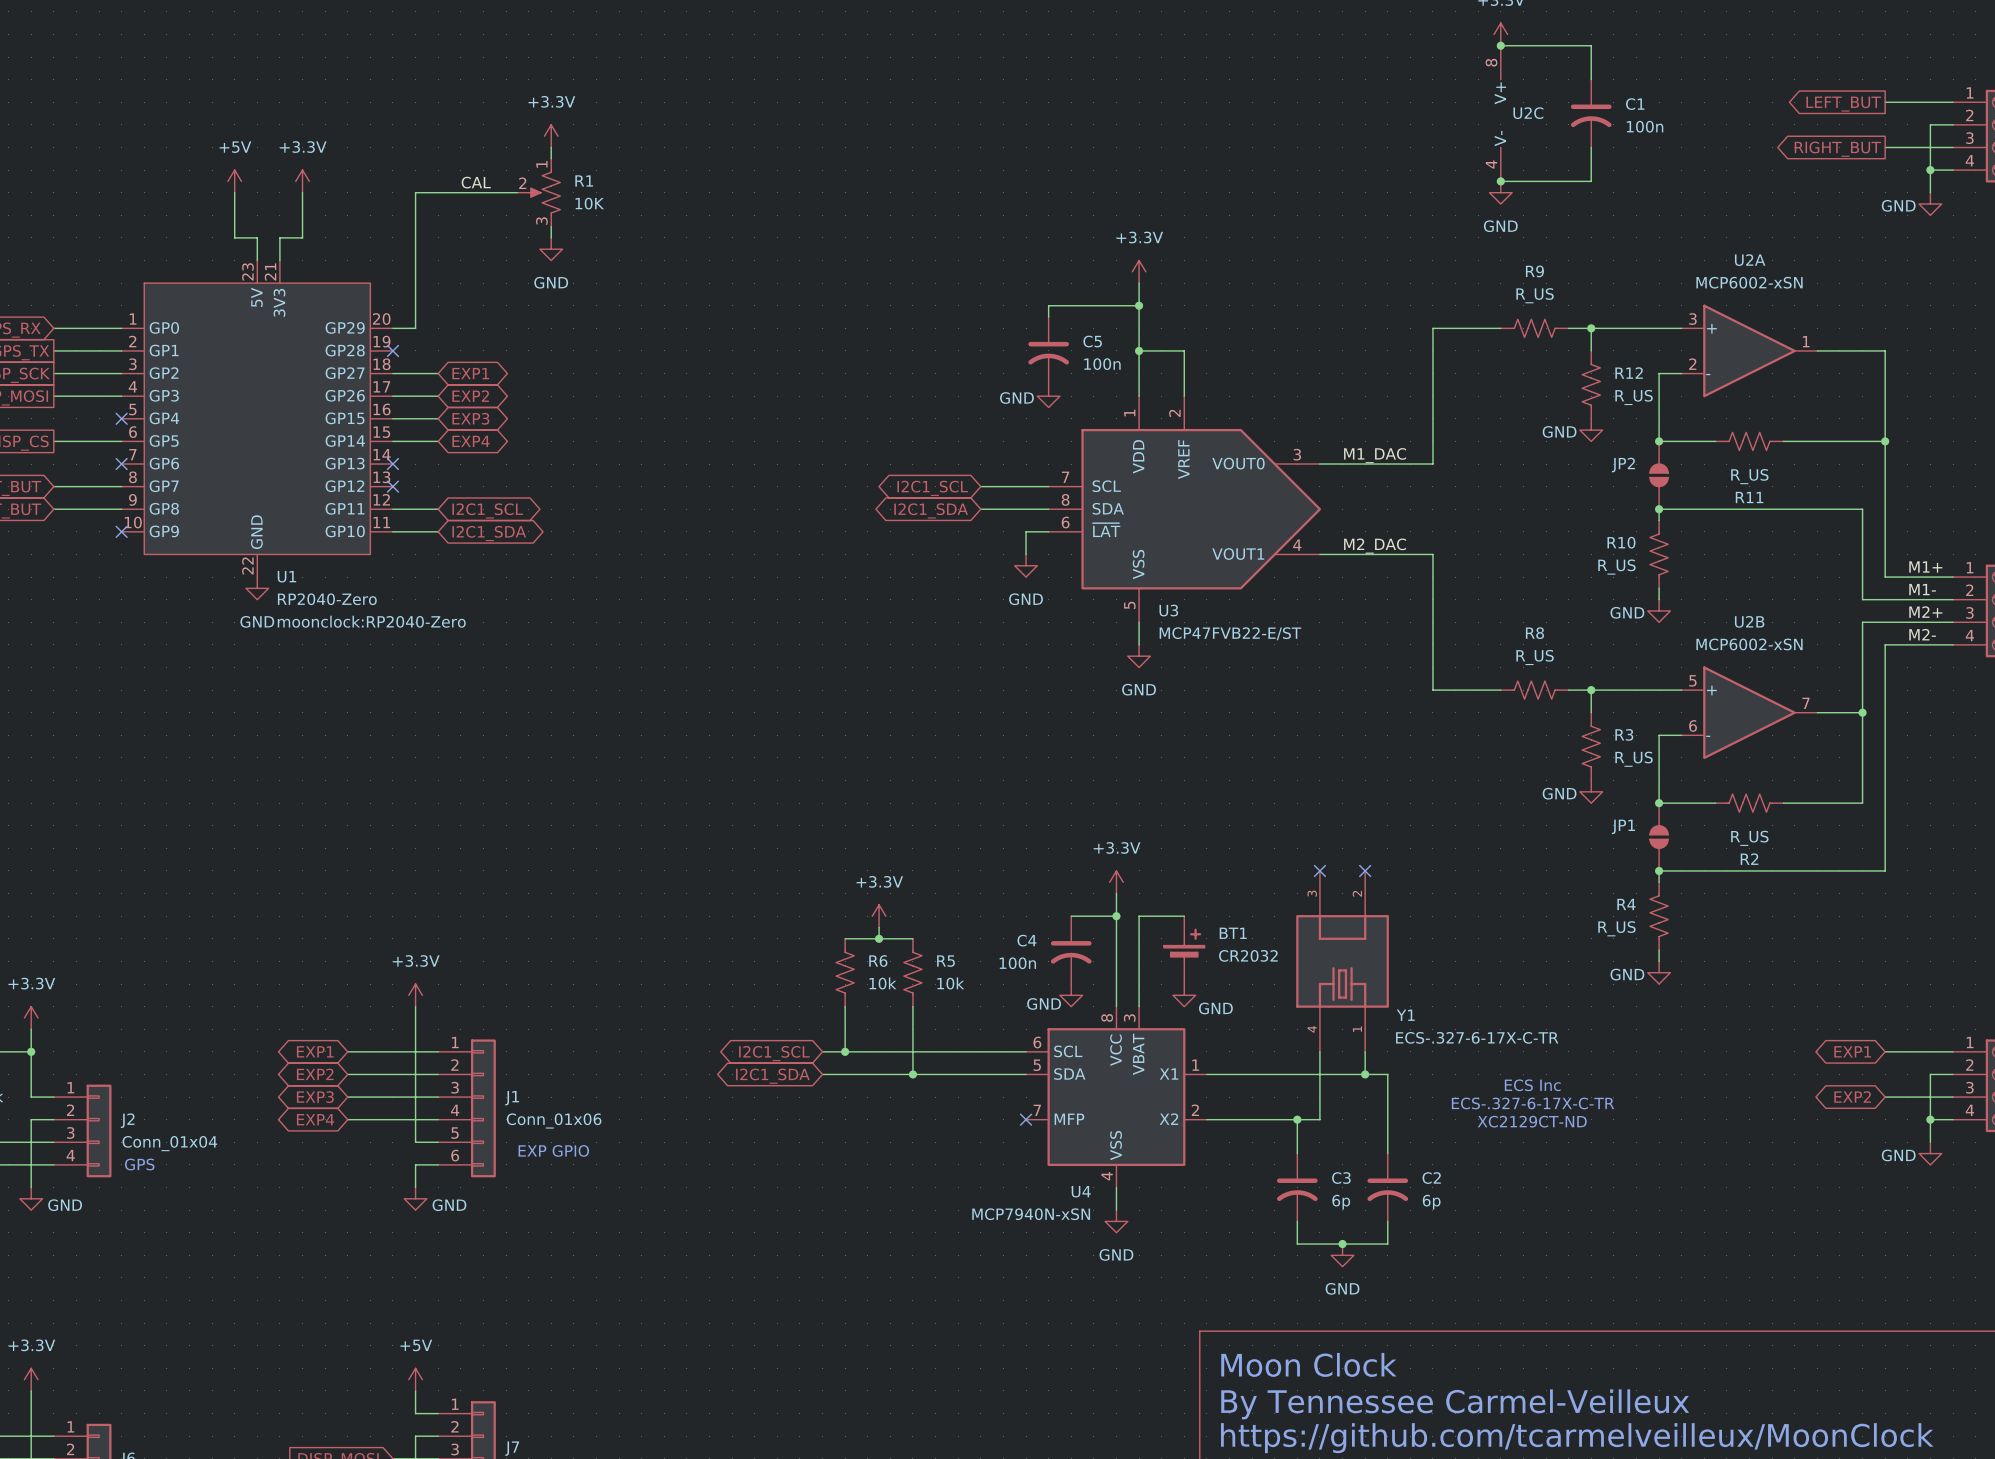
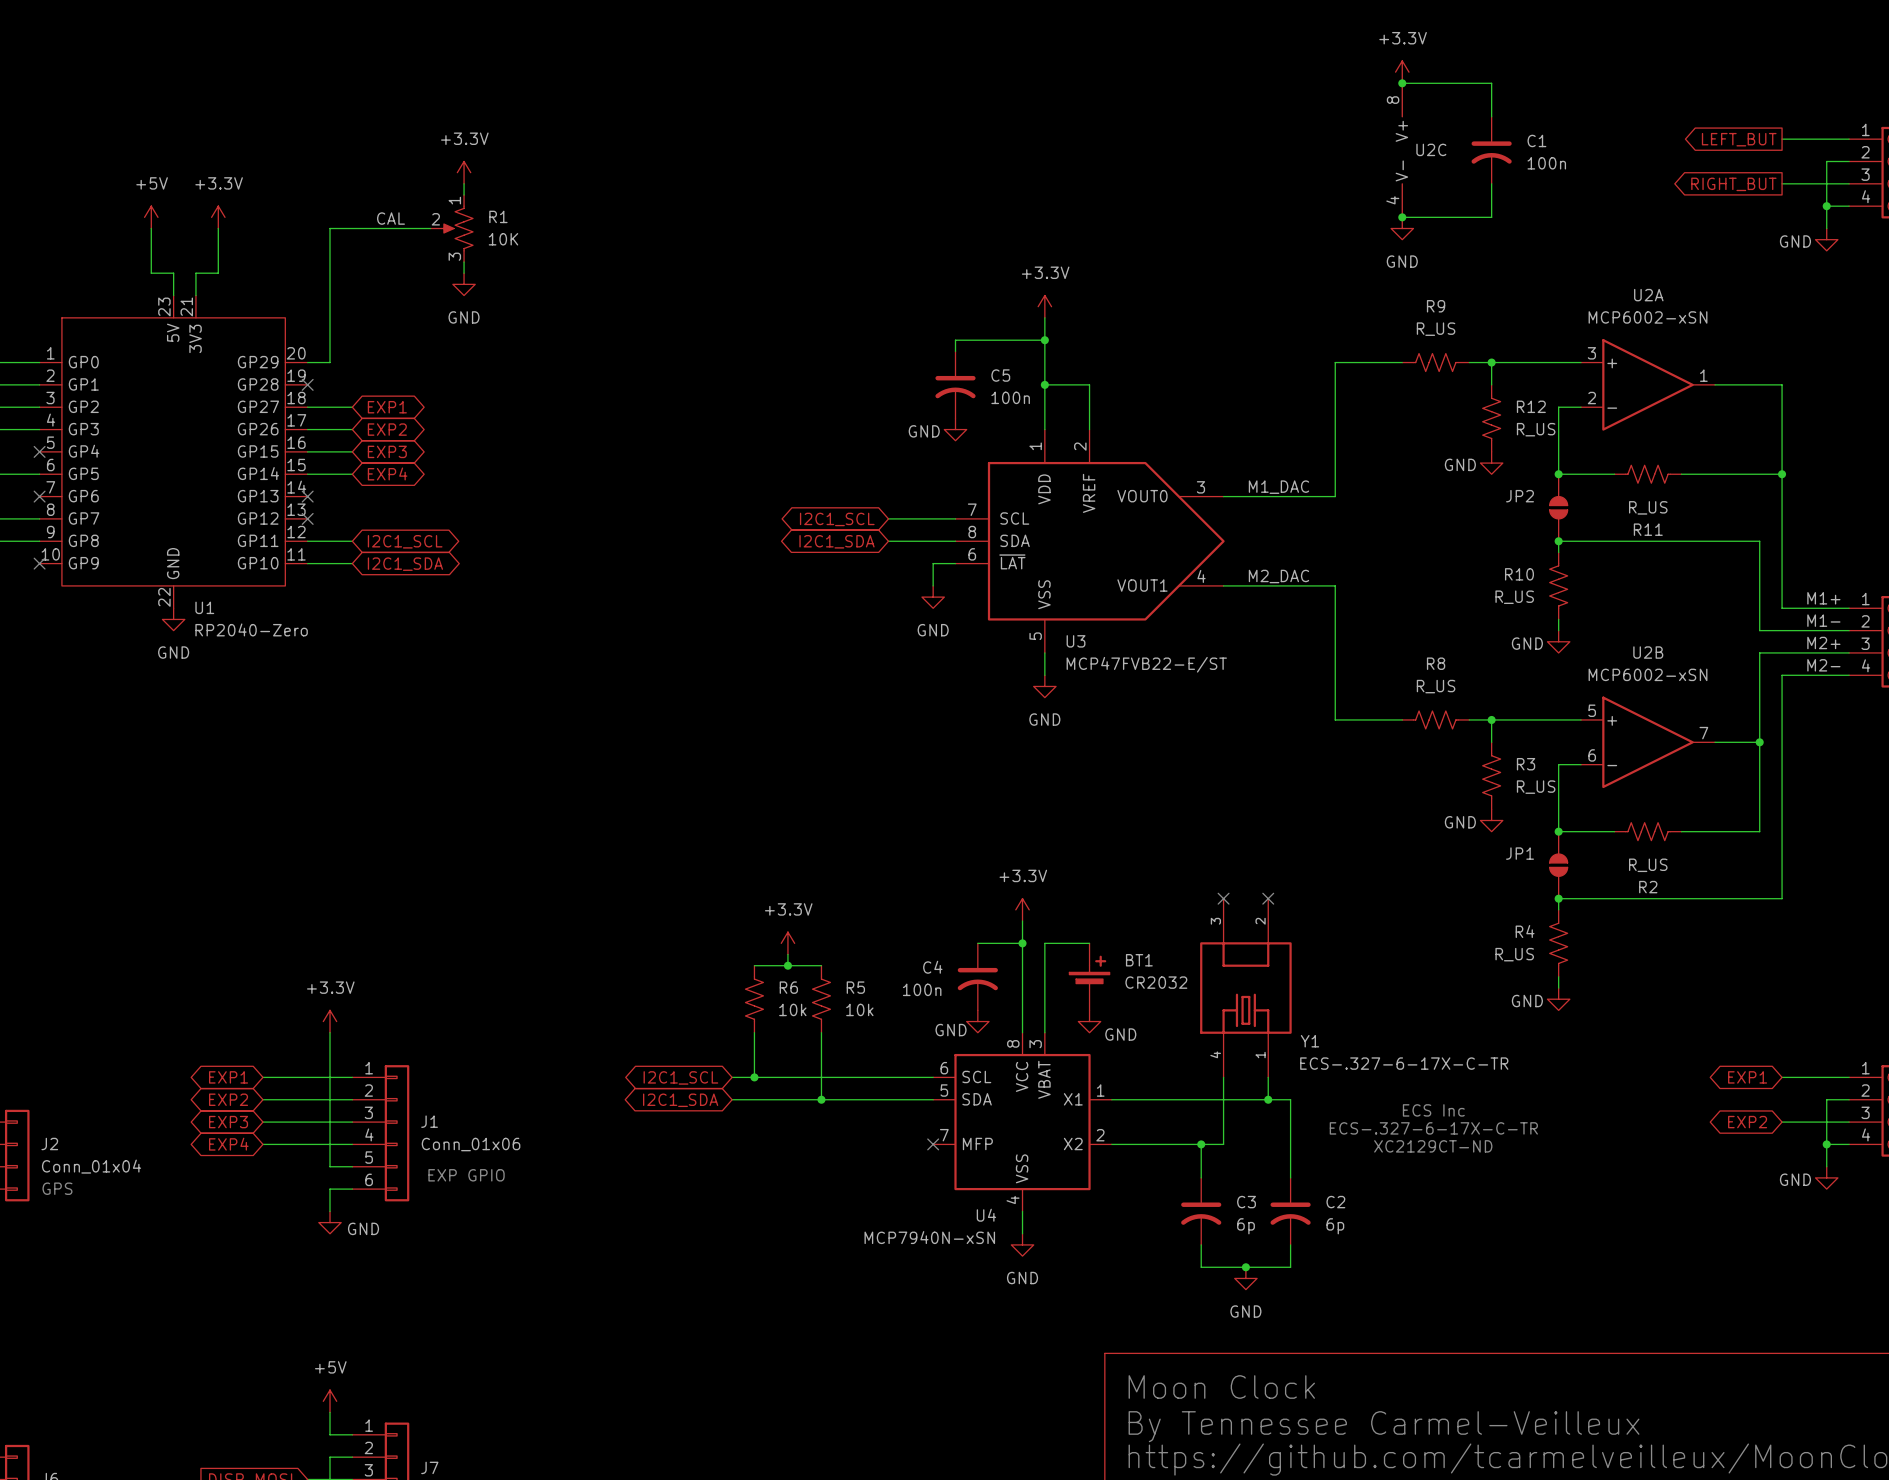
U1 text: moonclock:RP2040-Zero (371, 621) -> none

